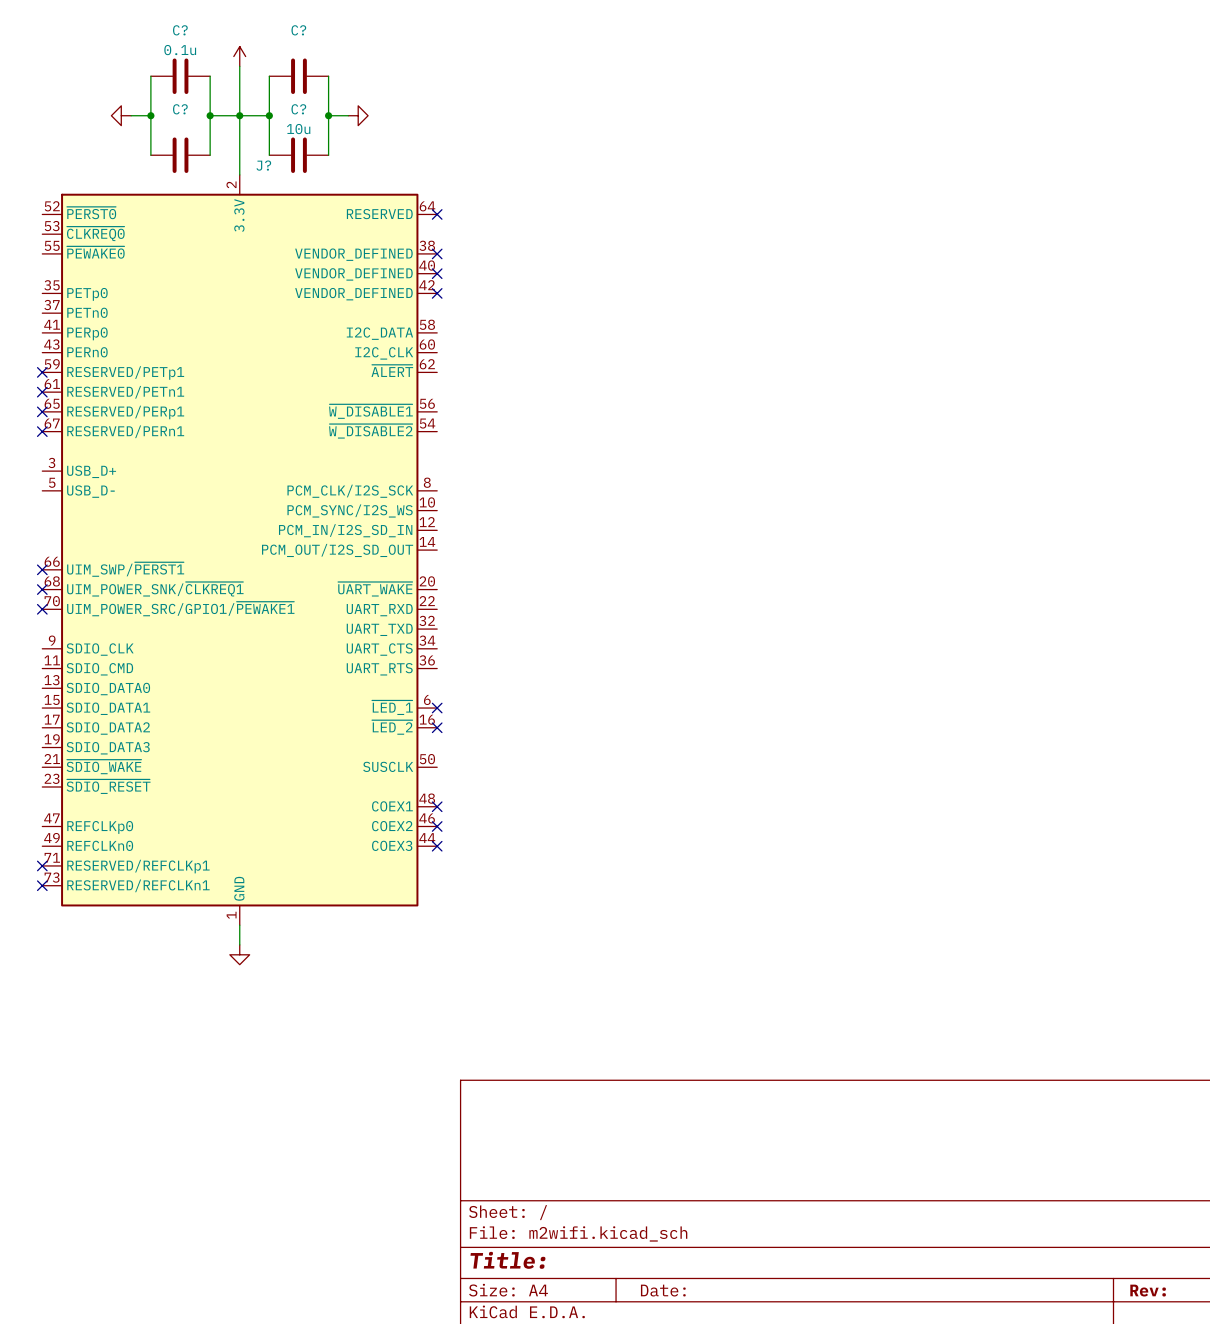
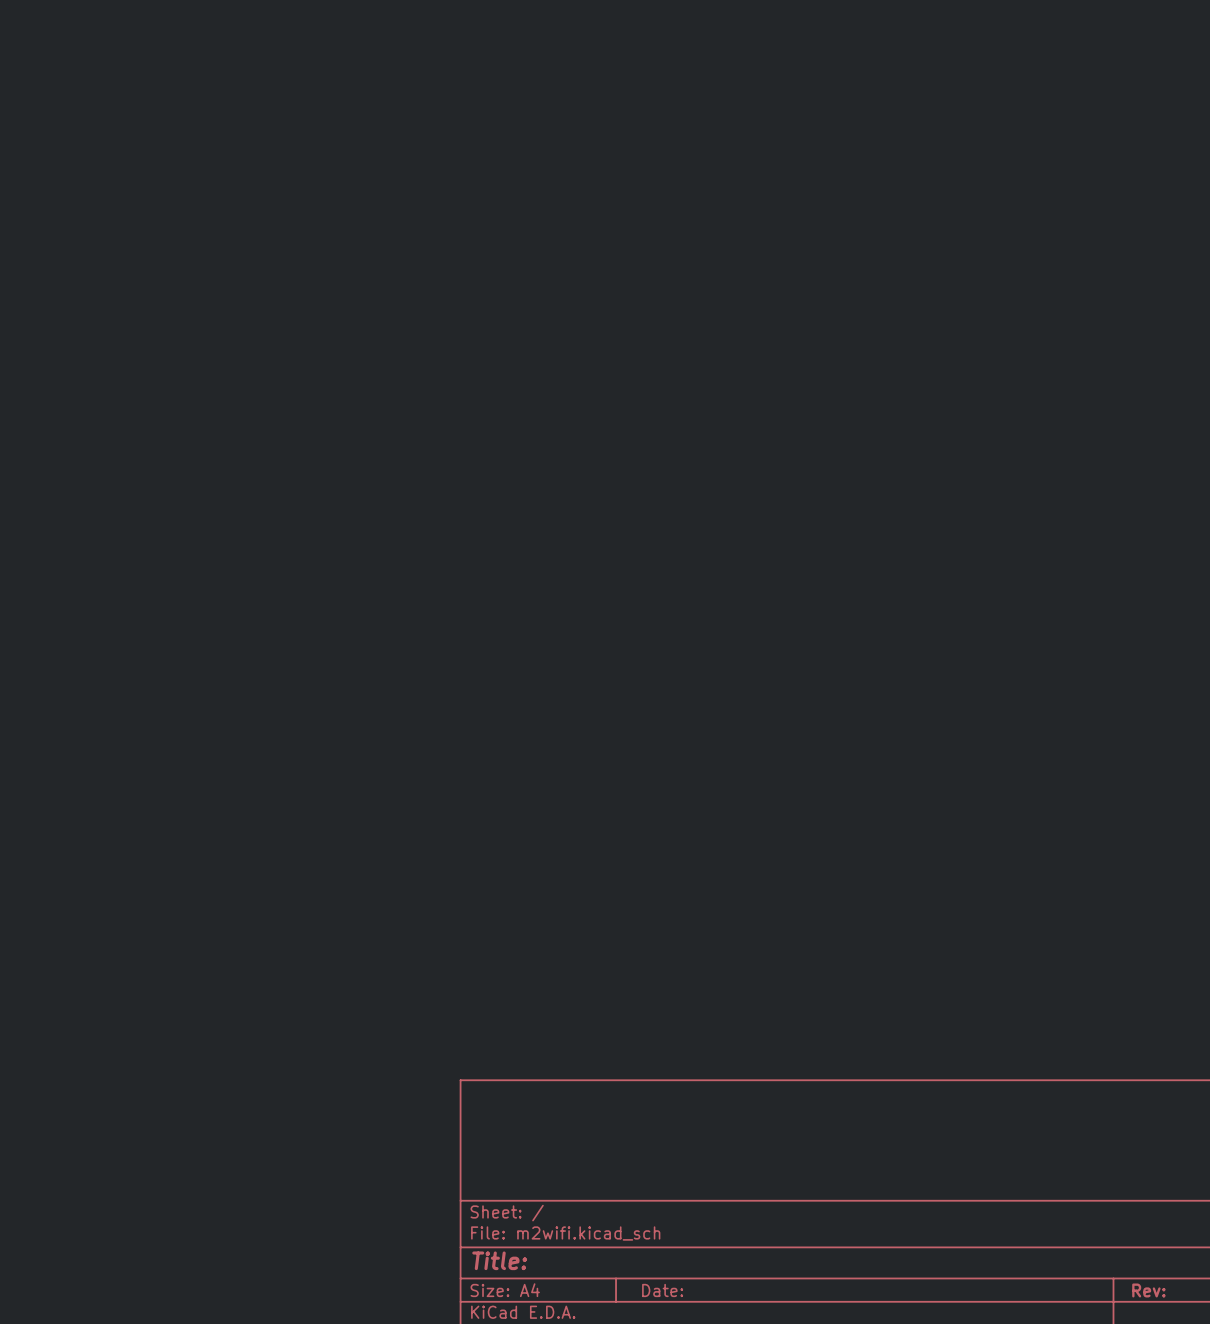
power symbol: (239, 56) -> none
wire: (239, 66) (239, 174) -> none
wire: (150, 76) (150, 155) -> none
C?: 0.1u (180, 76) -> none
wire: (210, 76) (210, 155) -> none
wire: (269, 76) (269, 155) -> none
C?: (298, 76) -> none
wire: (328, 76) (328, 155) -> none
power symbol: (121, 115) -> none
wire: (131, 115) (150, 115) -> none
junction: (150, 115) -> none
wire: (210, 115) (269, 115) -> none
junction: (210, 115) -> none
junction: (239, 115) -> none
junction: (269, 115) -> none
wire: (328, 115) (348, 115) -> none
junction: (328, 115) -> none
power symbol: (358, 115) -> none
C?: (180, 155) -> none
C?: 10u (298, 155) -> none
no-connect mark: (437, 214) -> none
no-connect mark: (437, 253) -> none
no-connect mark: (437, 273) -> none
no-connect mark: (437, 293) -> none
no-connect mark: (42, 372) -> none
no-connect mark: (42, 392) -> none
no-connect mark: (42, 411) -> none
no-connect mark: (42, 431) -> none
J?: (239, 550) -> none
no-connect mark: (42, 569) -> none
no-connect mark: (42, 589) -> none
no-connect mark: (42, 609) -> none
no-connect mark: (437, 708) -> none
no-connect mark: (437, 727) -> none
no-connect mark: (437, 806) -> none
no-connect mark: (437, 826) -> none
no-connect mark: (437, 846) -> none
no-connect mark: (42, 865) -> none
no-connect mark: (42, 885) -> none
wire: (239, 925) (239, 944) -> none
power symbol: (239, 954) -> none

